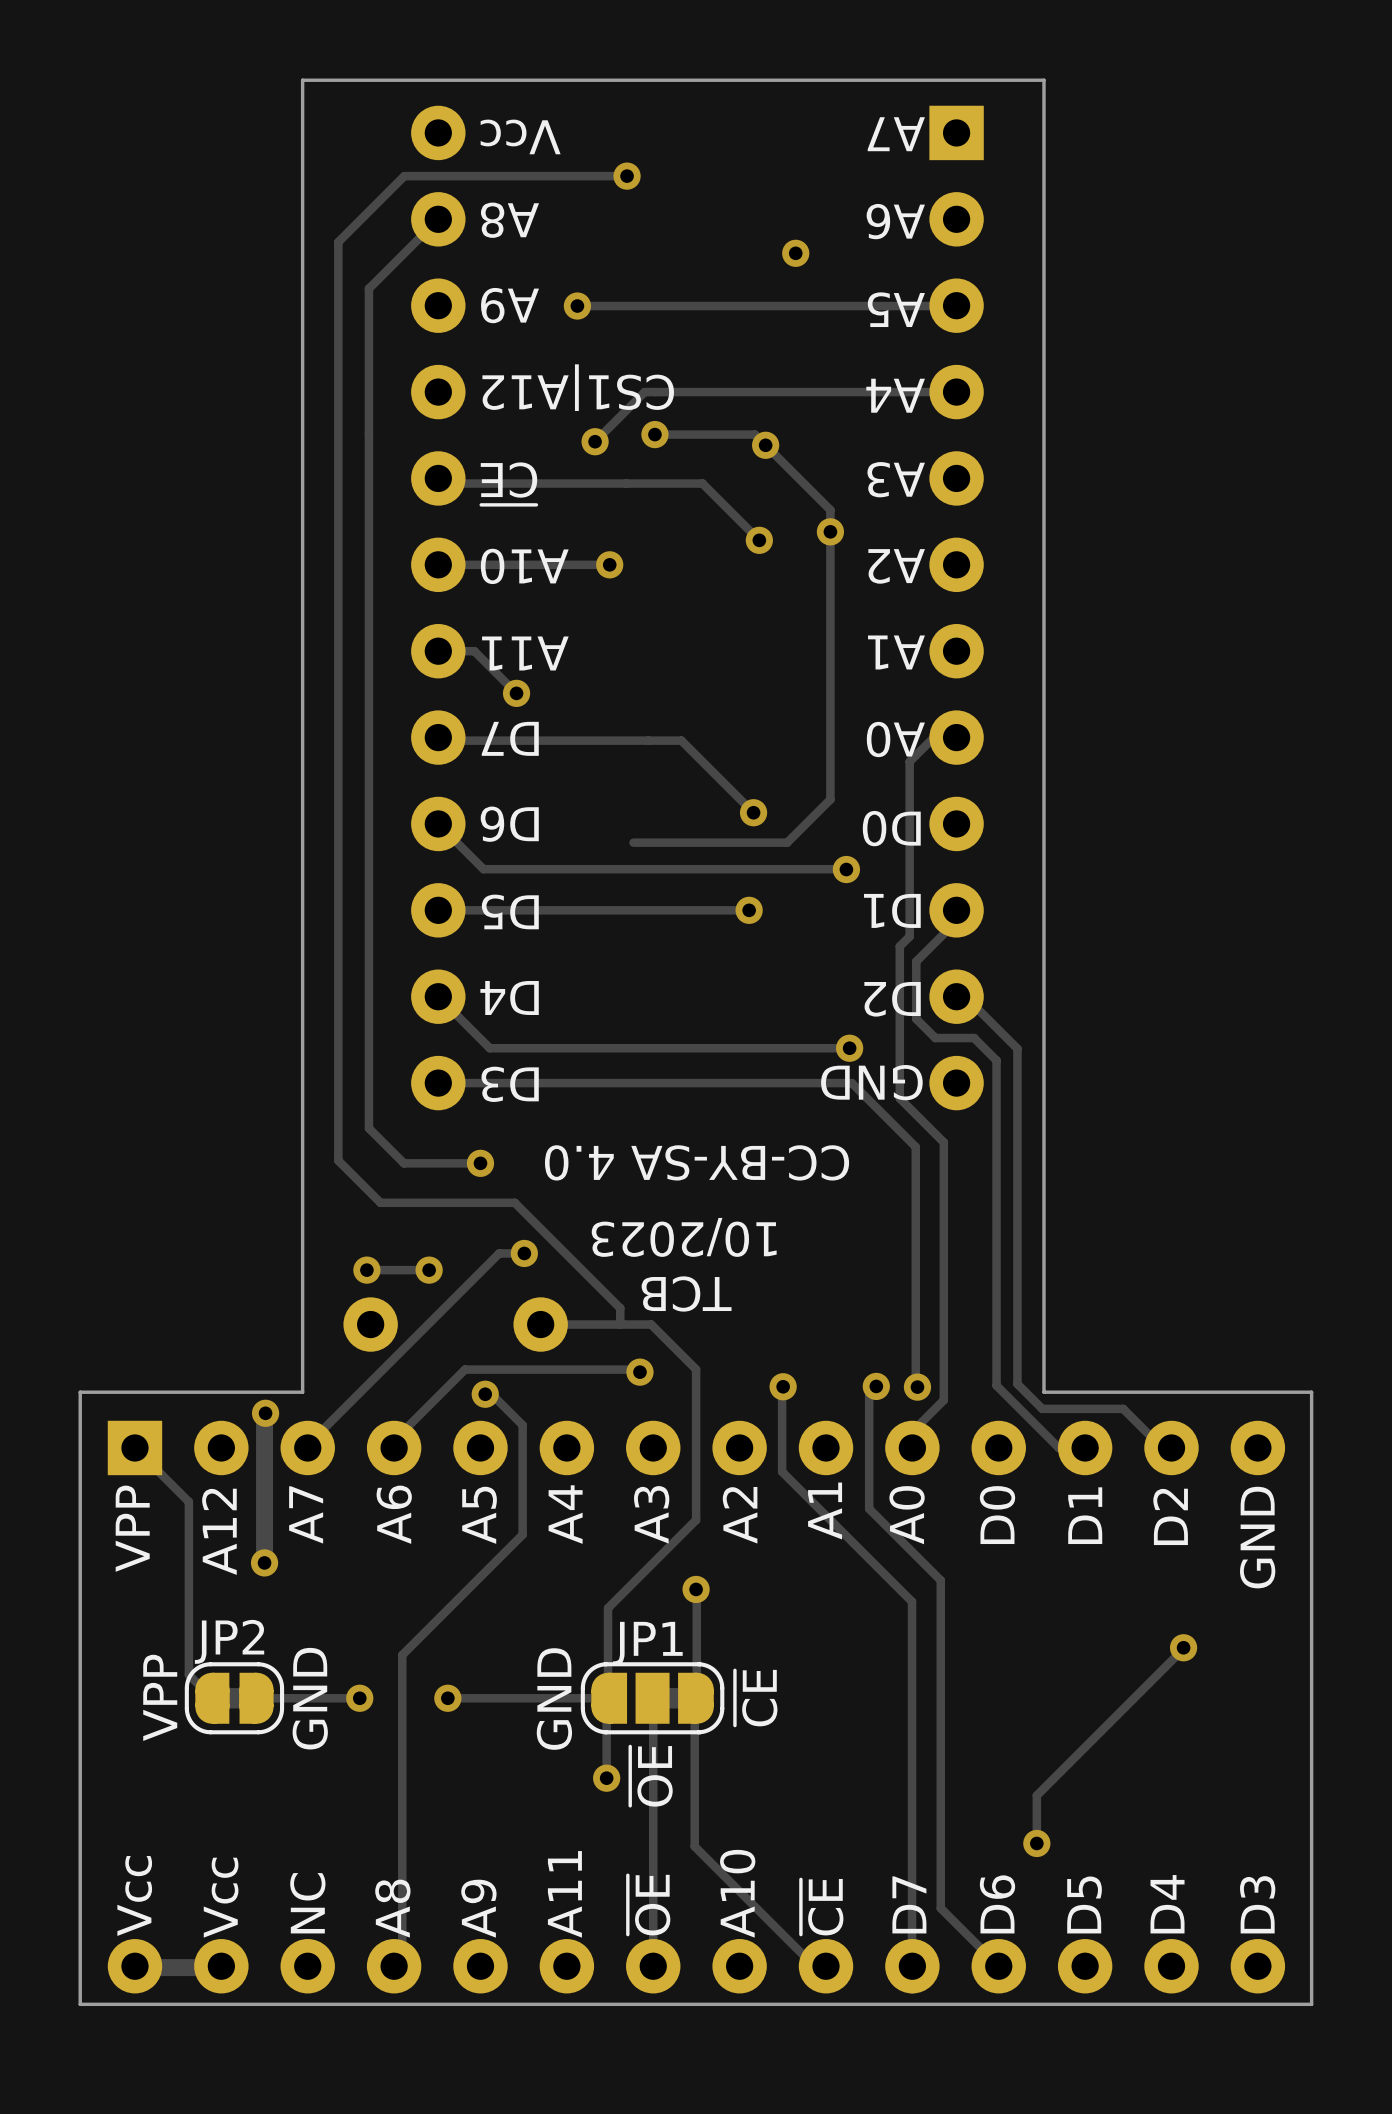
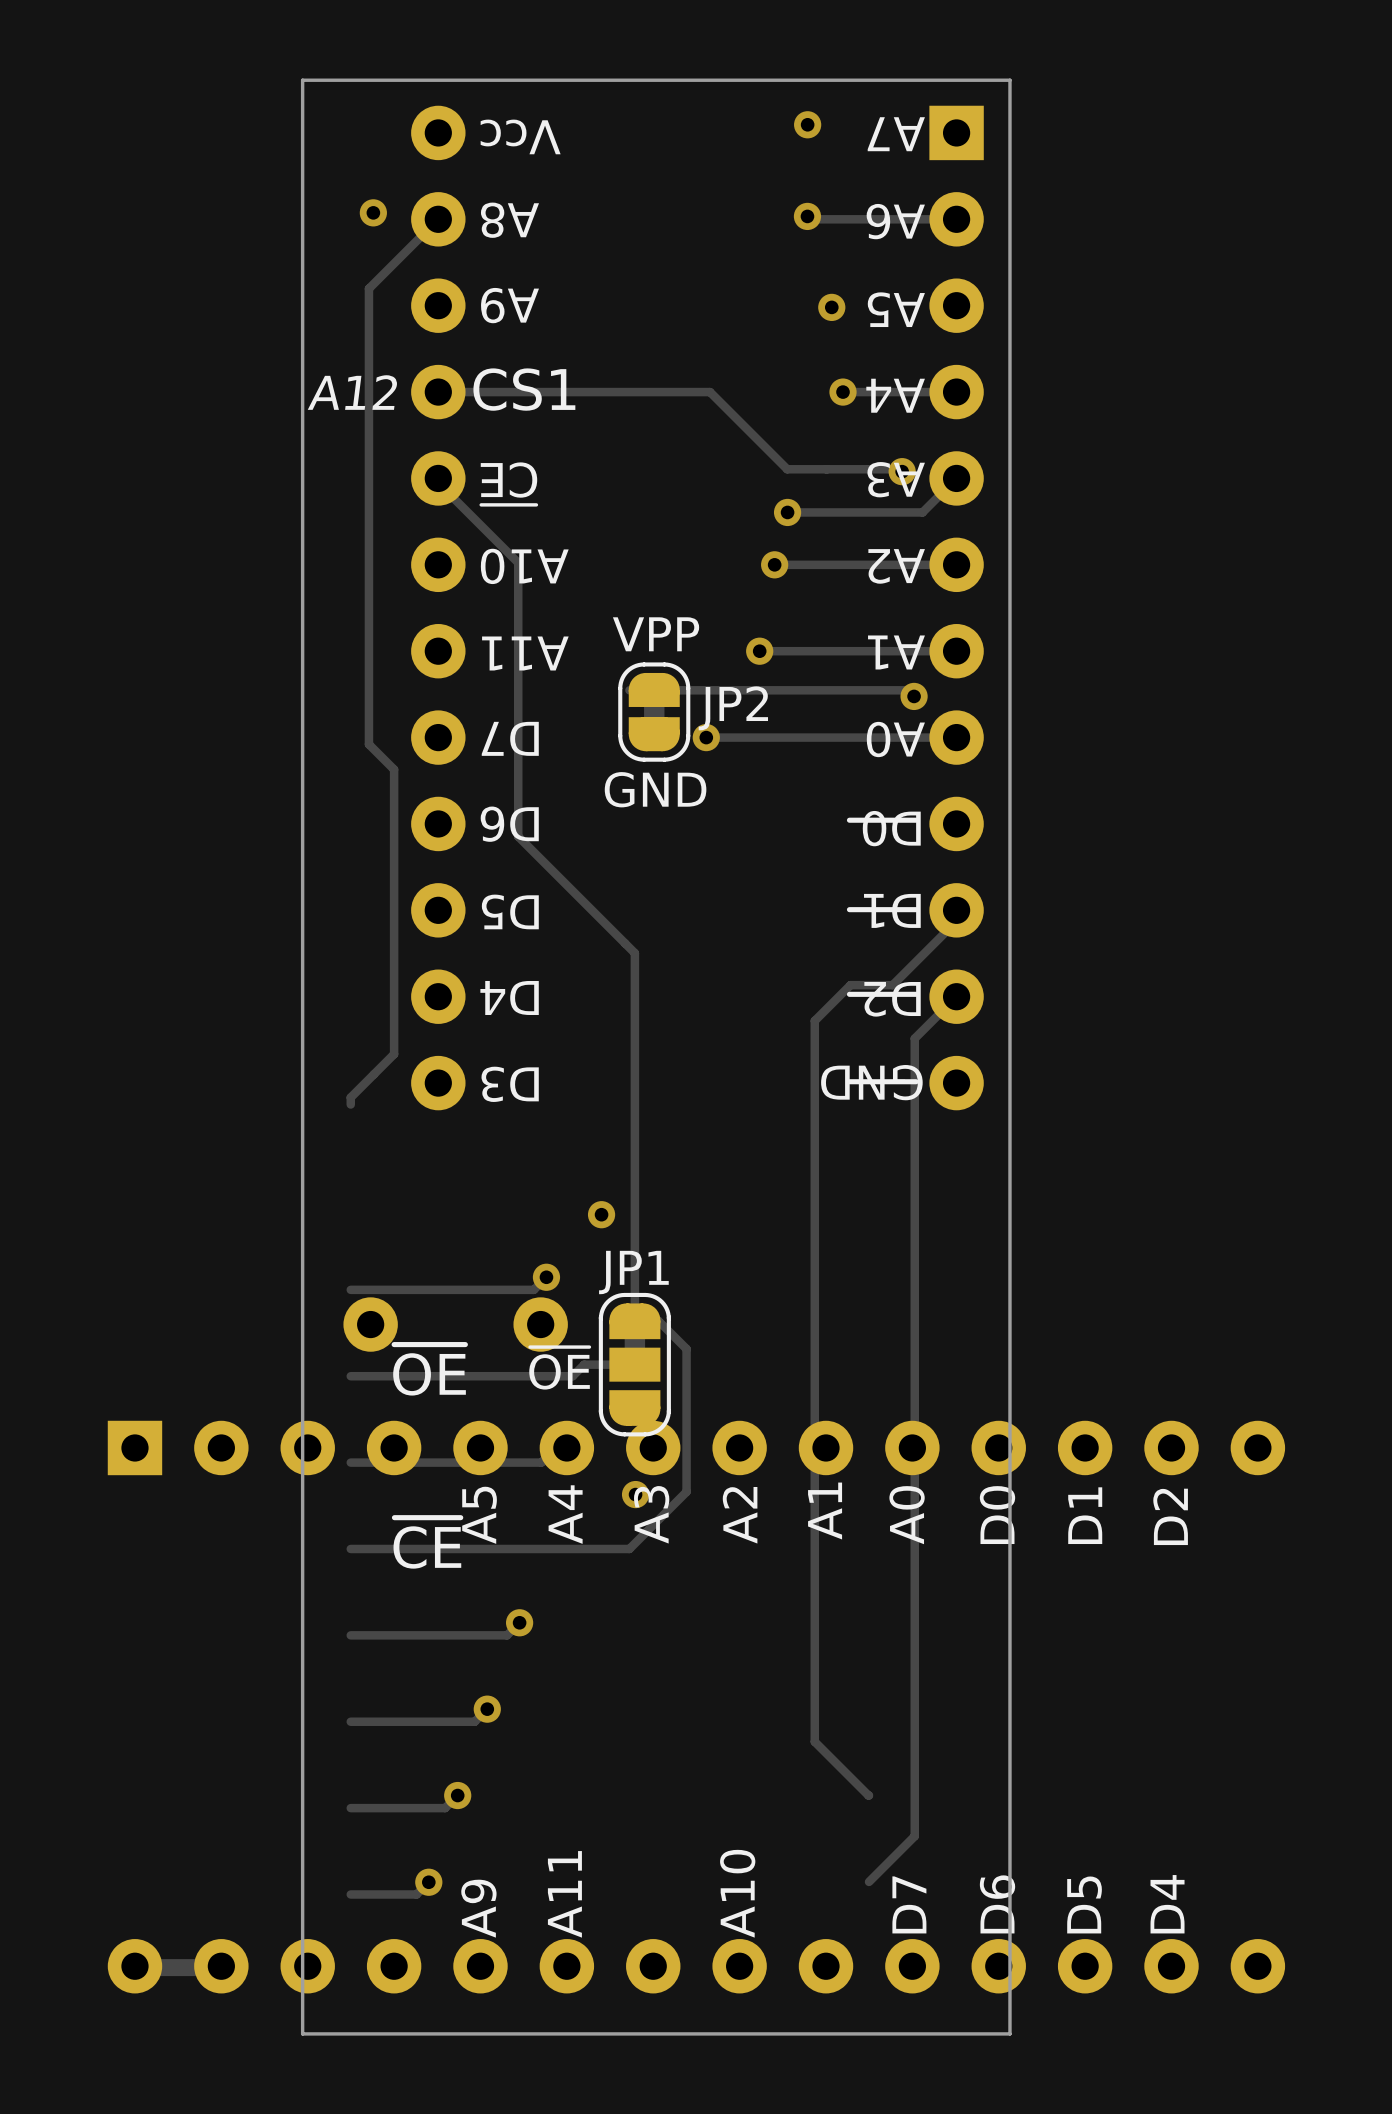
board edge: (1009, 80) (1043, 80) (1043, 1392) (1311, 1392) (1311, 2004) (80, 2004) (80, 1392) (302, 1392) -> (1009, 80) (1009, 2033) (302, 2033) (302, 1392)
via: none -> (807, 124)
track: (627, 176) (404, 176) (338, 242) (338, 1160) (380, 1202) (514, 1202) (620, 1308) (620, 1324) -> none
via: (627, 176) -> none
via: none -> (373, 212)
track: none -> (807, 216) (810, 219) (956, 219)
via: none -> (807, 216)
via: (795, 253) -> none
via: (577, 306) -> none
track: (956, 306) (577, 306) -> none
via: none -> (831, 307)
text: CS1|A12 (578, 387) -> CS1 (524, 389)
text: none -> A12 (352, 392)
track: (644, 392) (595, 441) -> (644, 392) (438, 392)
track: (843, 392) (710, 392) -> (902, 471) (899, 469) (787, 469) (710, 392)
via: none -> (843, 392)
track: (654, 434) (754, 434) (830, 510) (830, 799) (787, 842) (633, 842) -> none
via: (654, 434) -> none
via: (595, 441) -> none
via: (765, 445) -> none
via: none -> (902, 471)
track: (438, 478) (443, 483) (702, 483) (759, 540) -> none
track: none -> (956, 478) (922, 512) (787, 512)
track: none -> (438, 482) (518, 562) (518, 836) (634, 953) (634, 1320) (658, 1320) (686, 1349) (686, 1491) (629, 1548) (350, 1548)
via: none -> (787, 512)
via: (830, 531) -> none
via position: (759, 540) -> (774, 564)
track: (609, 564) (438, 564) -> none
via: (609, 564) -> none
track: none -> (956, 564) (774, 564)
text: none -> VPP (656, 634)
track: (438, 651) (474, 651) (516, 693) -> none
via: none -> (759, 651)
track: none -> (956, 651) (759, 651)
track: none -> (629, 690) (907, 690) (914, 696)
via: (516, 693) -> none
via: none -> (914, 696)
track: (438, 737) (441, 740) (681, 740) (753, 812) -> none
via: none -> (706, 737)
track: (933, 737) (909, 761) (909, 936) (899, 946) (899, 1098) (943, 1142) (943, 1400) (912, 1431) (912, 1447) -> (933, 737) (706, 737)
track: (368, 744) (368, 1128) (403, 1163) (480, 1163) -> (368, 744) (394, 769) (394, 1054) (350, 1097) (350, 1104)
text: none -> GND (655, 789)
via: (753, 812) -> none
line: none -> (916, 820) (849, 820)
track: (438, 823) (483, 869) (846, 869) -> none
via: (846, 869) -> none
line: none -> (916, 909) (849, 909)
track: (749, 910) (438, 910) -> none
via: (749, 910) -> none
track: (916, 961) (916, 1018) (935, 1038) (974, 1038) (996, 1060) (996, 1385) (1058, 1447) (1085, 1447) -> (916, 961) (892, 985) (850, 985) (814, 1020) (814, 1741) (868, 1795)
line: none -> (916, 994) (849, 994)
track: (438, 996) (489, 1048) (849, 1048) -> none
track: (956, 996) (965, 996) (1017, 1048) (1017, 1384) (1042, 1408) (1123, 1408) (1171, 1456) -> (956, 996) (914, 1038) (914, 1836) (869, 1881)
via: (849, 1048) -> none
line: none -> (916, 1081) (849, 1081)
track: (438, 1083) (851, 1083) (915, 1147) (915, 1385) (917, 1387) -> none
text: CC-BY-SA 4.0 (697, 1162) -> none
via: (480, 1163) -> none
via: none -> (601, 1214)
text: 10/2023 (684, 1237) -> none
track: (524, 1253) (499, 1253) (307, 1445) -> none
via position: (524, 1253) -> (546, 1277)
via: (366, 1270) -> none
track: (429, 1270) (366, 1270) -> none
via: (429, 1270) -> none
track: none -> (546, 1277) (533, 1289) (350, 1289)
text: TCB (686, 1293) -> none
track: (540, 1324) (651, 1324) (696, 1369) (696, 1520) (608, 1608) (608, 1697) -> none
track: none -> (634, 1364) (584, 1364) (572, 1376) (350, 1376)
text: none -> ~{OE} (559, 1368)
text: none -> ~{OE} (429, 1370)
track: (639, 1372) (637, 1369) (465, 1369) (394, 1440) (394, 1447) -> none
via: (639, 1372) -> none
track: (783, 1386) (782, 1471) (912, 1601) (912, 1989) -> none
via: (783, 1386) -> none
track: (876, 1386) (869, 1393) (869, 1508) (940, 1580) (940, 1908) (998, 1966) -> none
via: (876, 1386) -> none
via: (917, 1387) -> none
track: (485, 1394) (491, 1394) (522, 1425) (522, 1534) (402, 1655) (402, 1981) -> none
via: (485, 1394) -> none
via: (265, 1413) -> none
track: (264, 1422) (264, 1562) -> none
track: (134, 1447) (188, 1501) (188, 1674) (212, 1698) -> none
track: none -> (553, 1450) (541, 1462) (350, 1462)
via: none -> (635, 1494)
text: A7 (306, 1514) -> none
text: A6 (394, 1514) -> none
text: VPP (132, 1528) -> none
text: A12 (219, 1531) -> none
text: GND (1257, 1537) -> none
text: none -> ~{CE} (427, 1543)
via: (264, 1562) -> none
track: (696, 1589) (694, 1846) (814, 1966) (826, 1966) -> none
via: (696, 1589) -> none
track: none -> (519, 1622) (507, 1635) (350, 1635)
via: none -> (519, 1622)
track: (1183, 1647) (1036, 1795) (1036, 1843) -> none
via: (1183, 1647) -> none
text: VPP (160, 1697) -> none
JP2 rotation: 0° (234, 1698) -> 90° clockwise (654, 712)
JP2 position: (234, 1698) -> (654, 712)
text: GND (310, 1698) -> none
track: (359, 1698) (256, 1698) -> none
via: (359, 1698) -> none
via position: (447, 1698) -> (487, 1709)
track: (448, 1698) (608, 1698) (606, 1699) (606, 1778) -> none
JP1 rotation: 0° (652, 1698) -> 90° counterclockwise (634, 1364)
JP1 position: (652, 1698) -> (634, 1364)
track: (653, 1698) (653, 1966) -> none
text: ~{CE} (756, 1698) -> none
text: GND (554, 1699) -> none
track: none -> (487, 1709) (474, 1721) (350, 1721)
text: ~{OE} (651, 1776) -> none
via: (606, 1778) -> none
track: none -> (457, 1795) (445, 1808) (350, 1808)
via: none -> (457, 1795)
via: (1036, 1843) -> none
track: none -> (428, 1882) (416, 1894) (350, 1894)
via: none -> (428, 1882)
text: Vcc (134, 1895) -> none
text: Vcc (221, 1897) -> none
text: NC (307, 1903) -> none
text: D3 (1257, 1904) -> none
text: ~{OE} (649, 1905) -> none
text: ~{CE} (822, 1907) -> none
text: A8 (392, 1908) -> none

